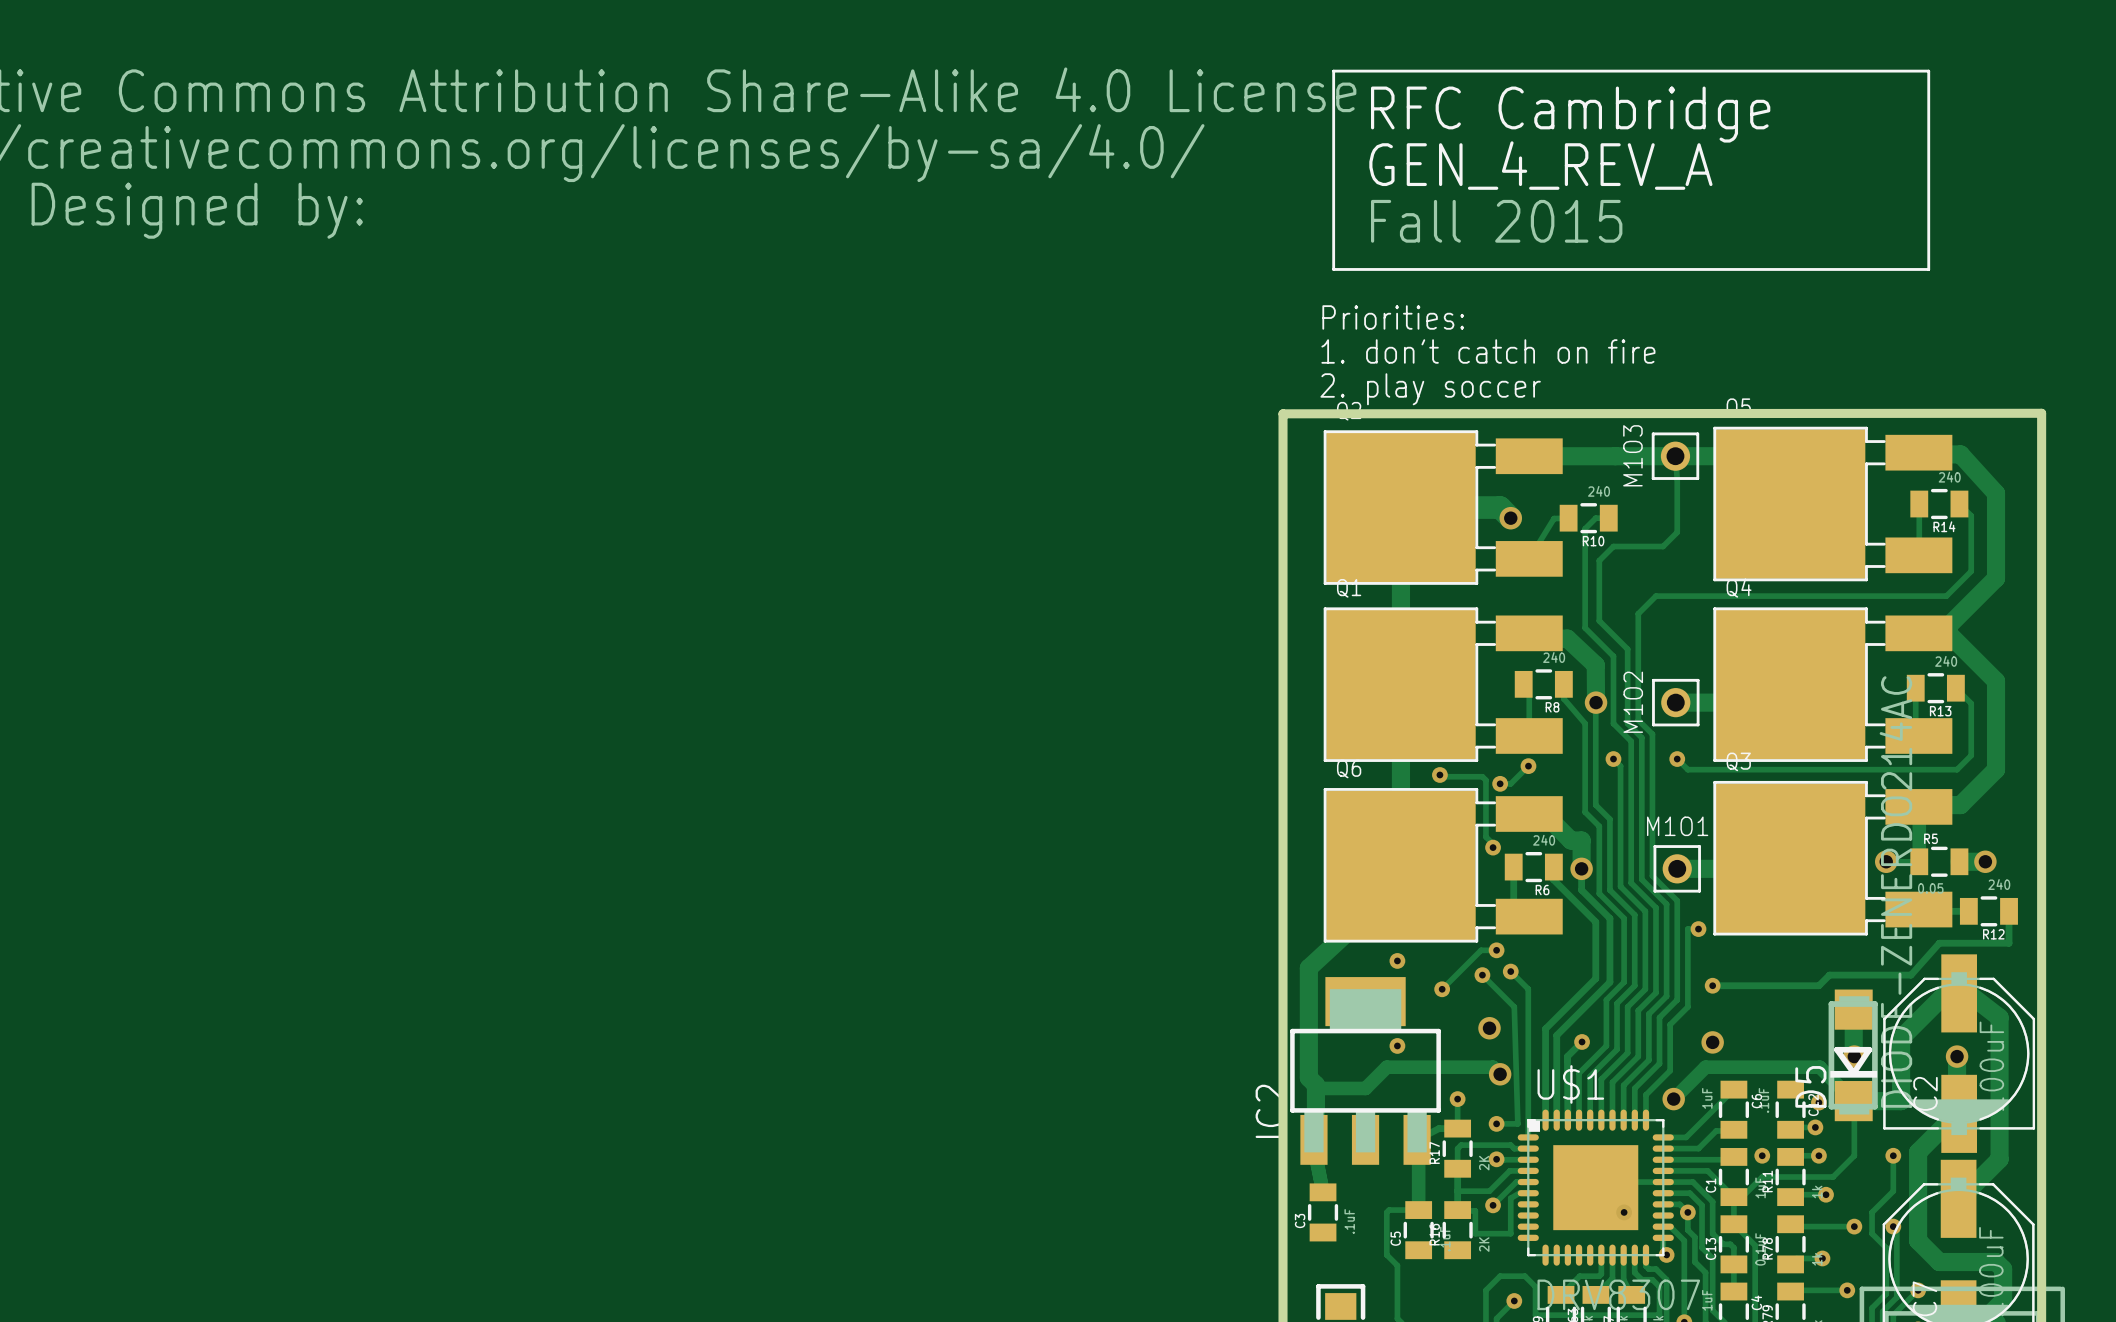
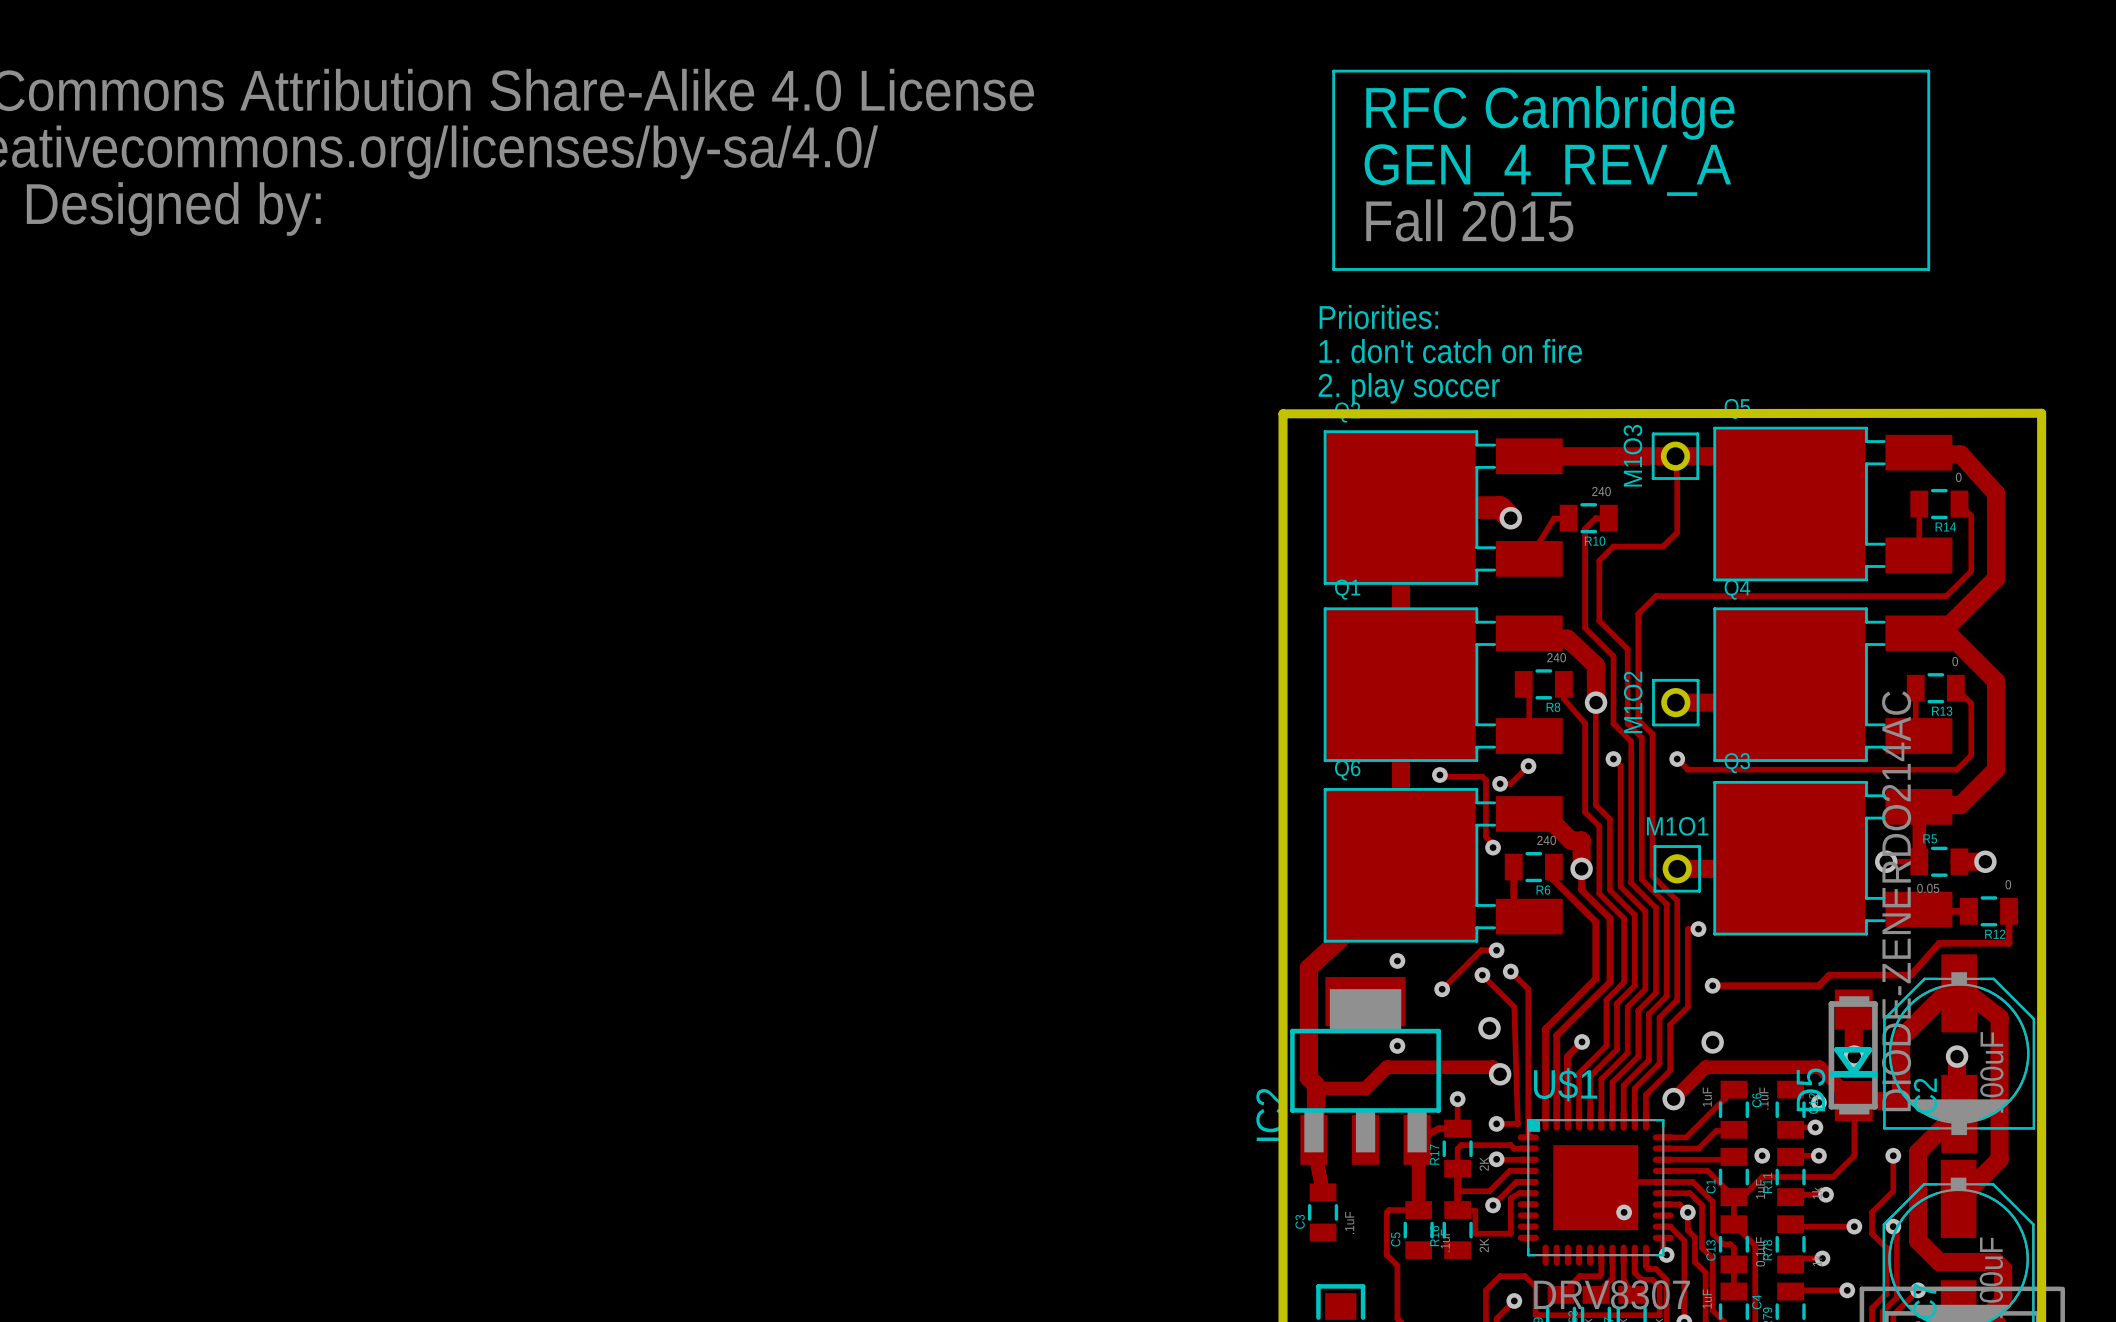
R14 value: 240 (1949, 477) -> 0 (1958, 477)
R13 value: 240 (1946, 661) -> 0 (1955, 661)
R12 value: 240 (1999, 884) -> 0 (2008, 884)

